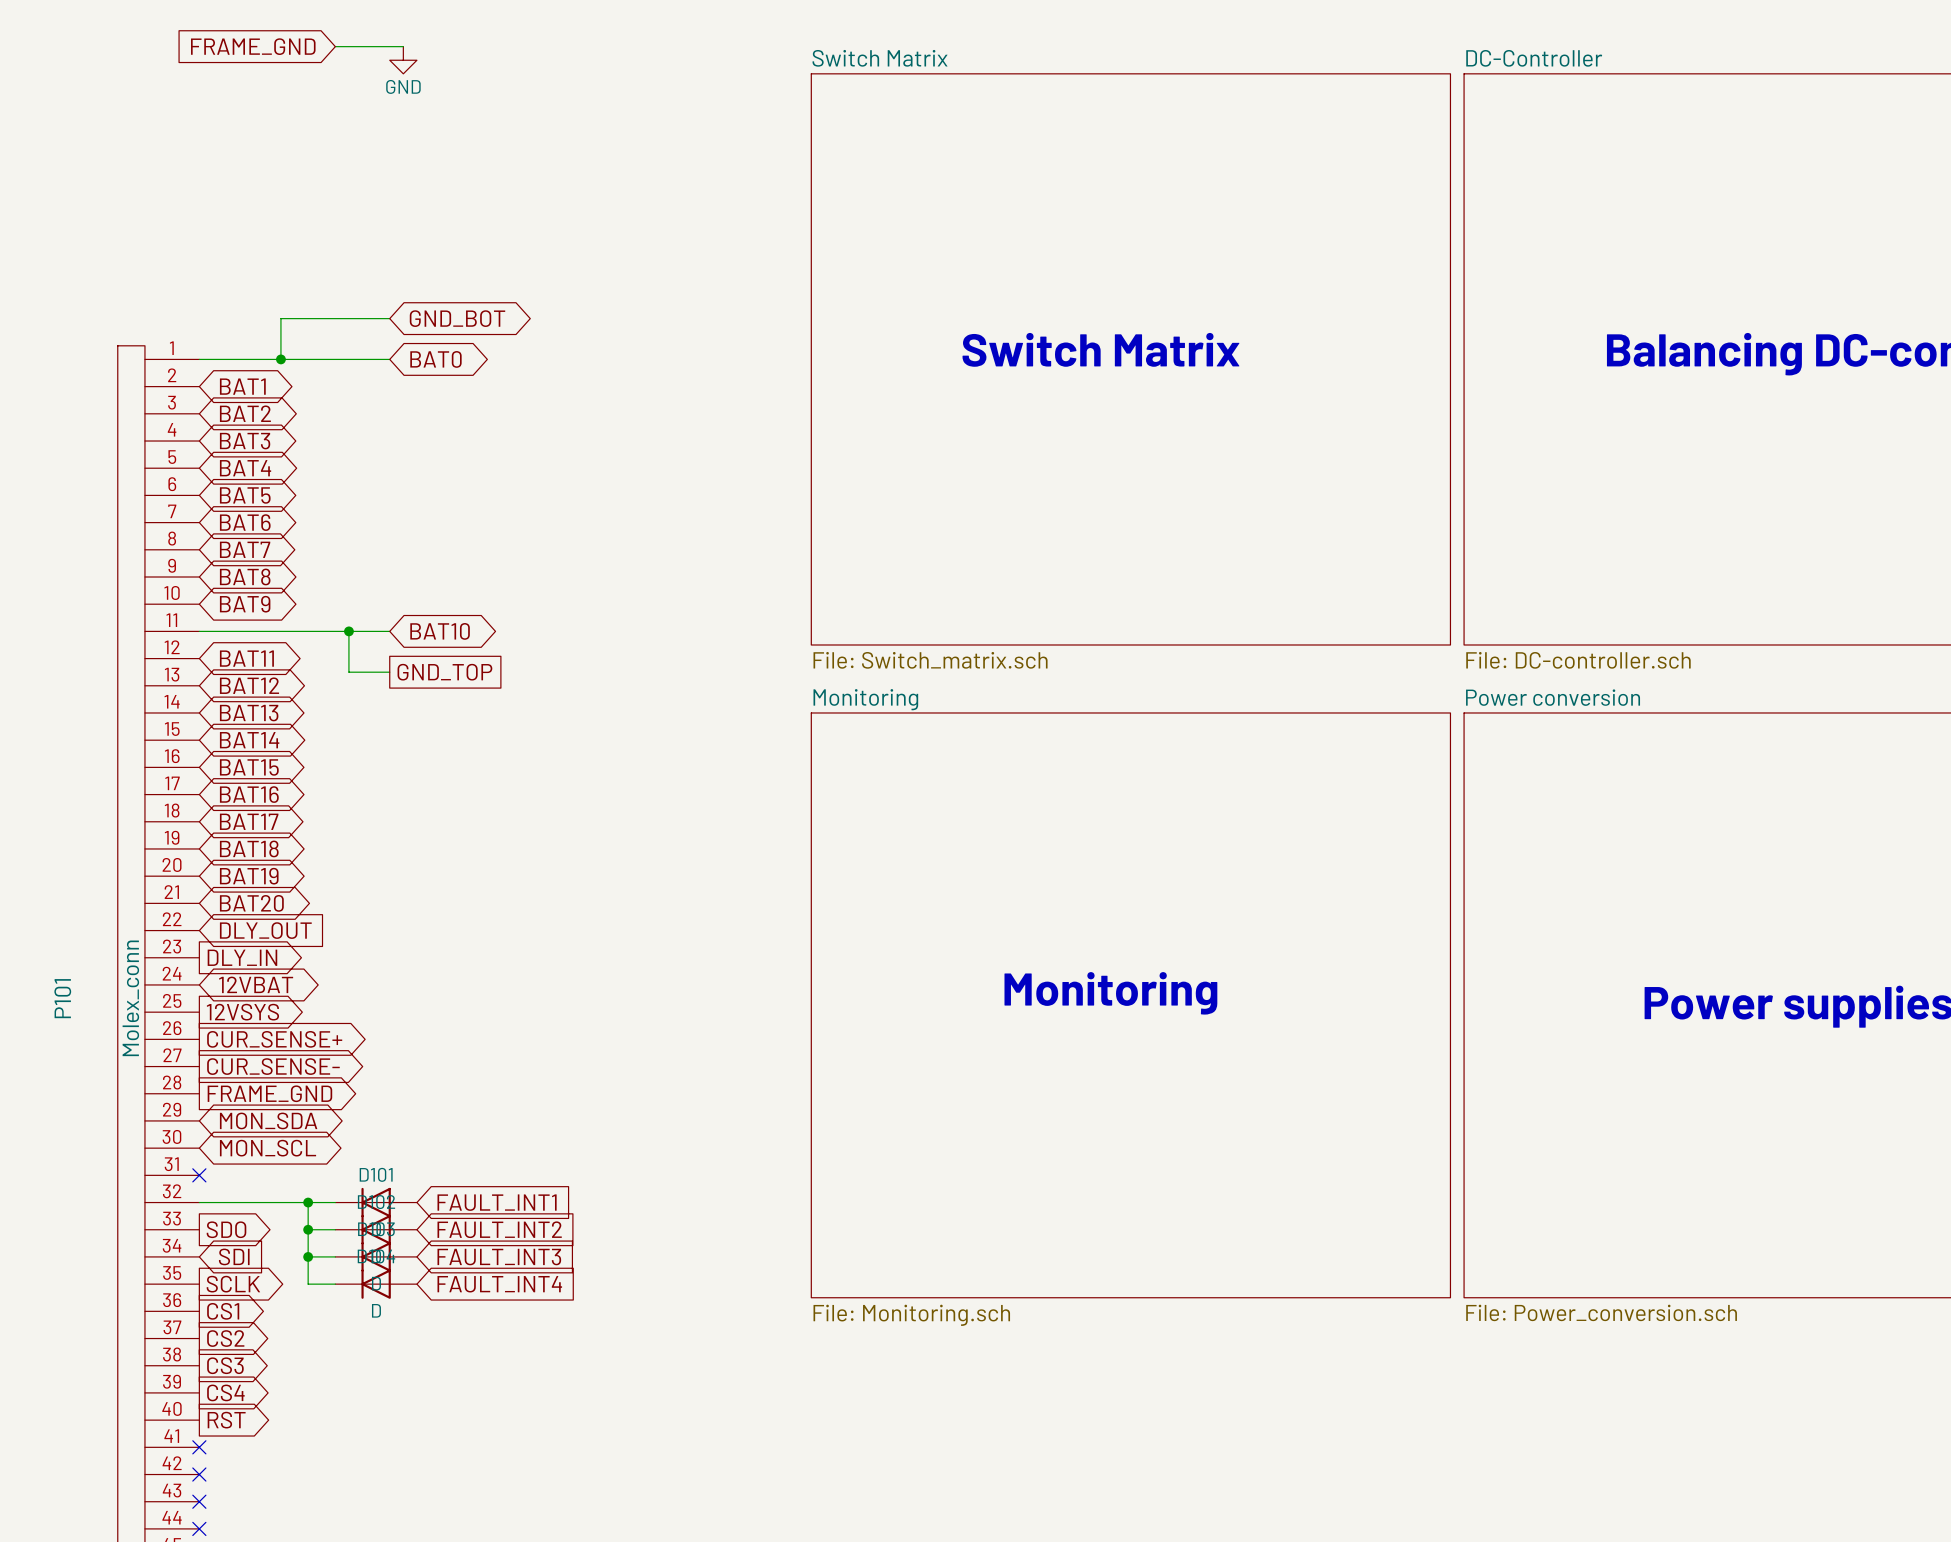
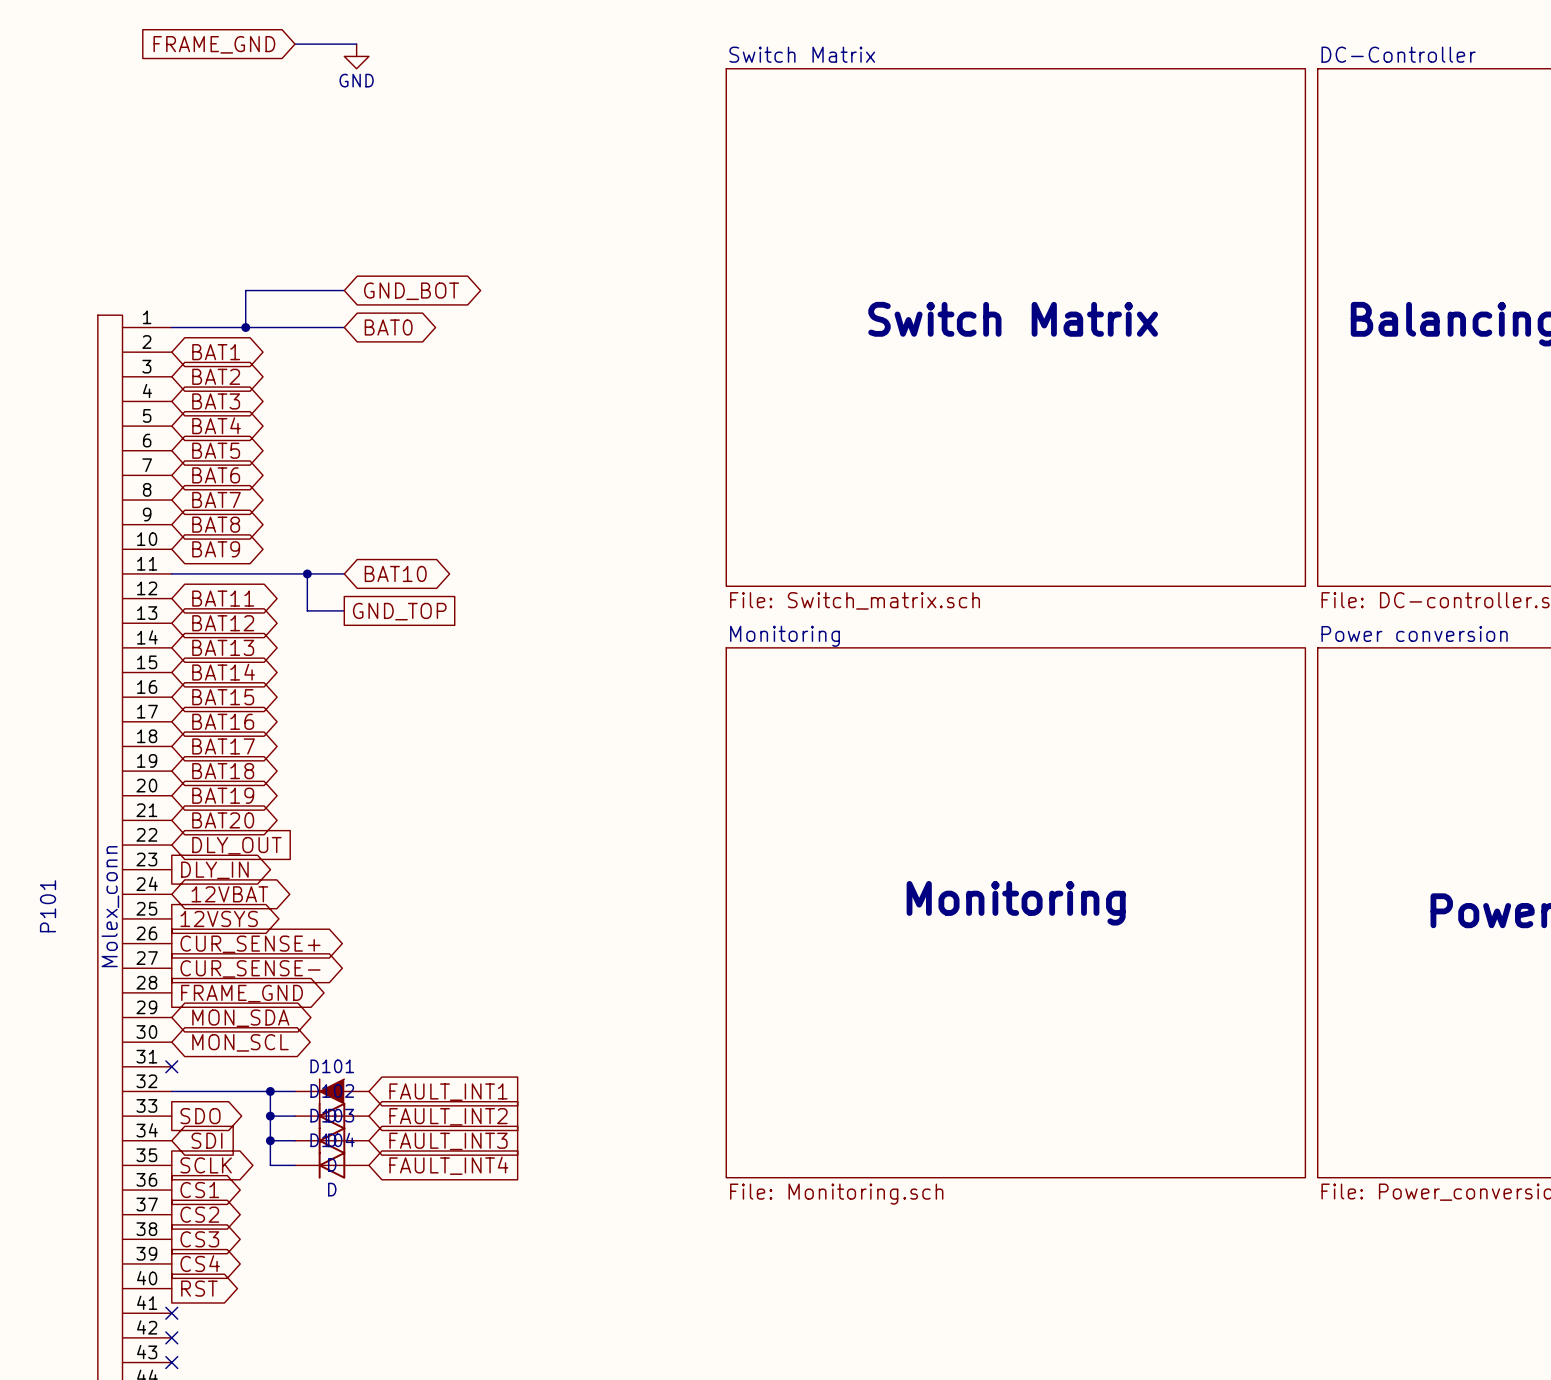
D101 symbol: [335, 1187, 417, 1218] -> [295, 1078, 369, 1105]

